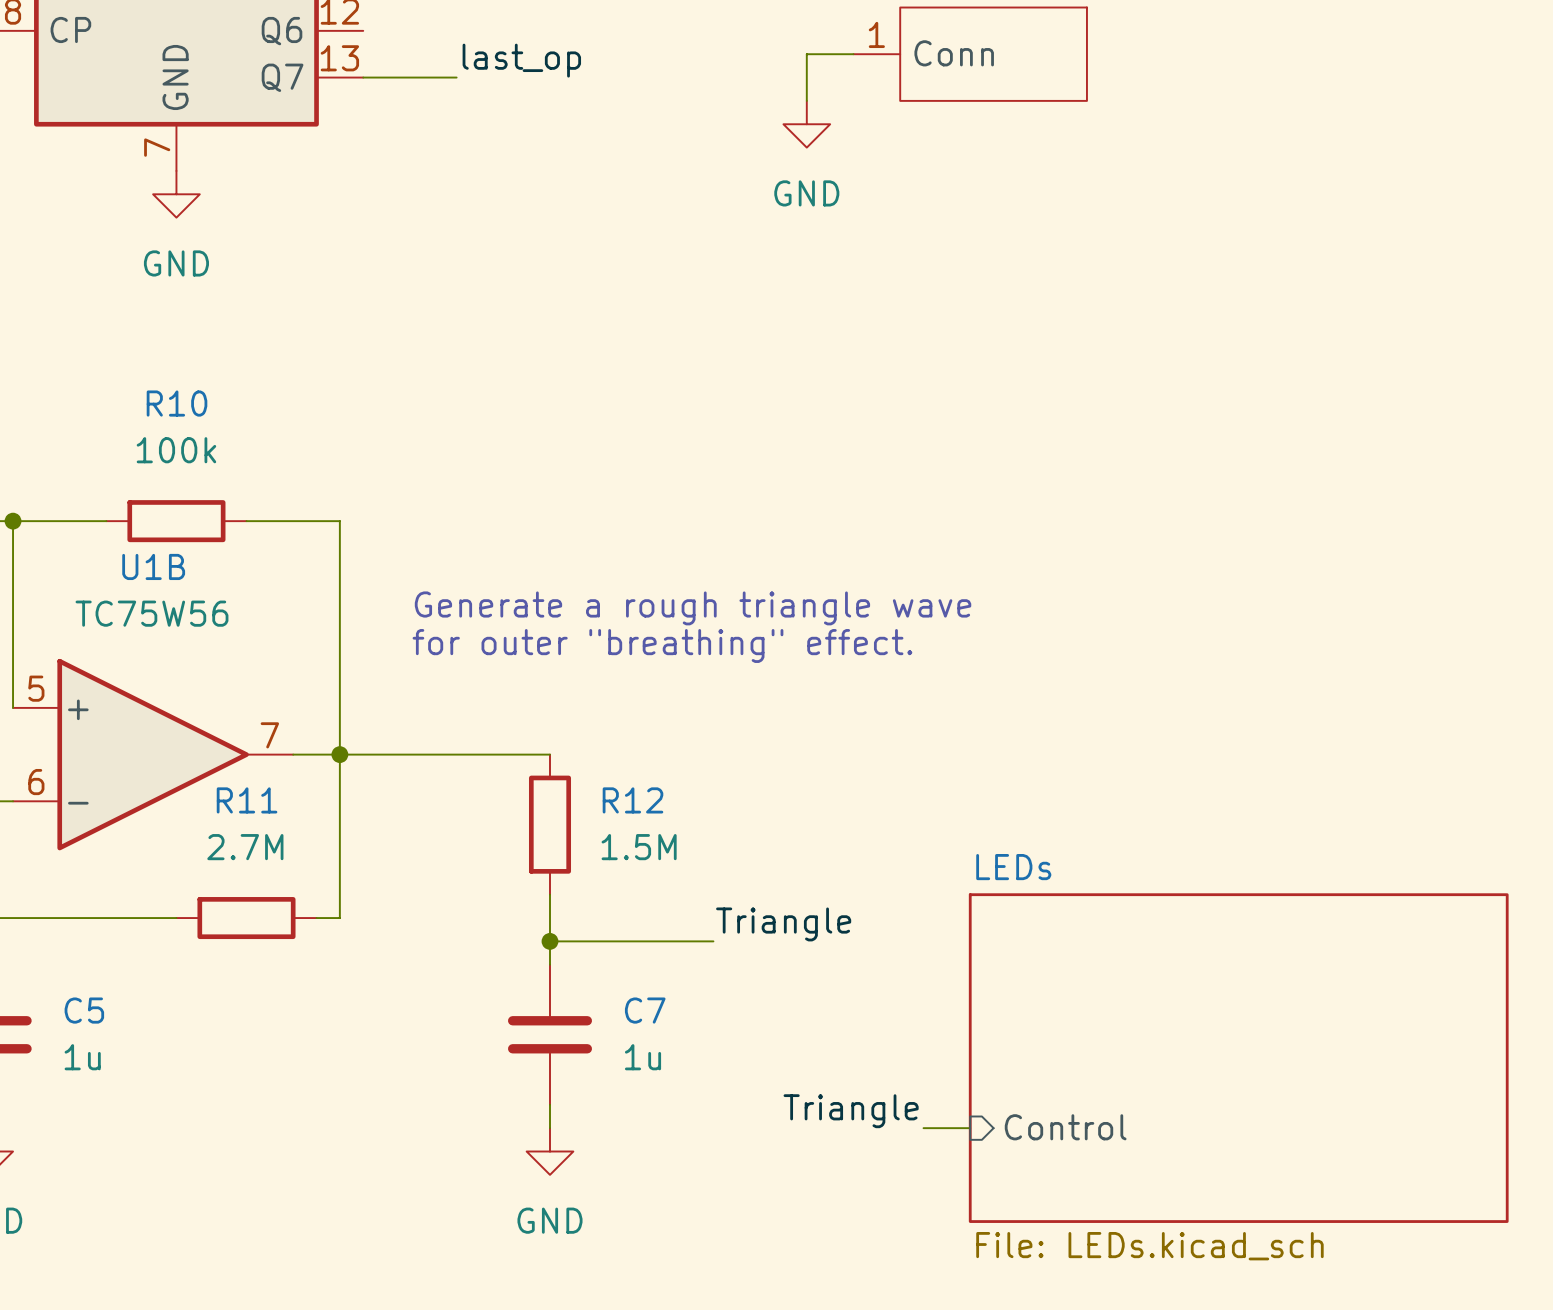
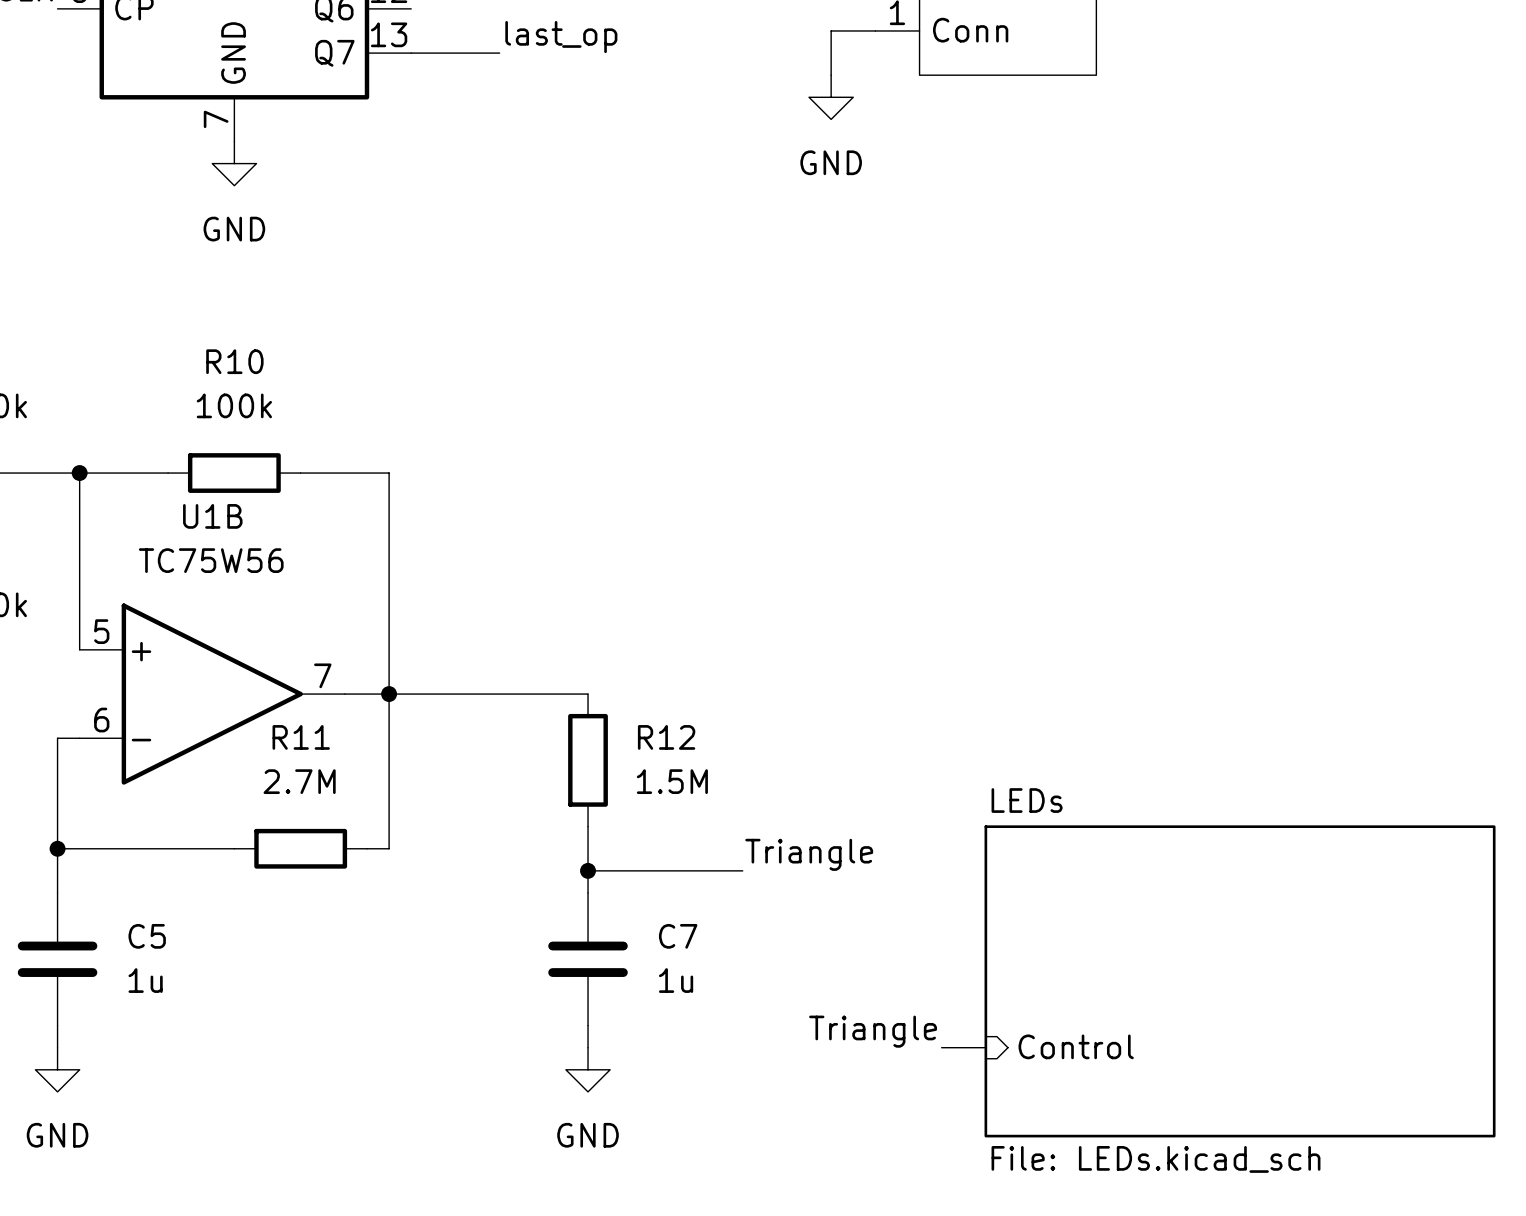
text: Generate a rough triangle wave (693, 608) -> none
text: for outer "breathing" effect. (662, 645) -> none

